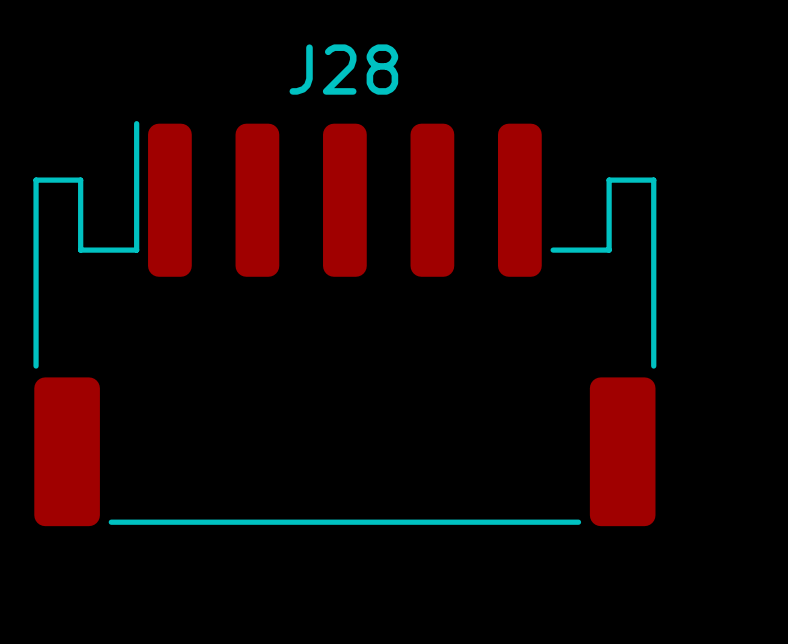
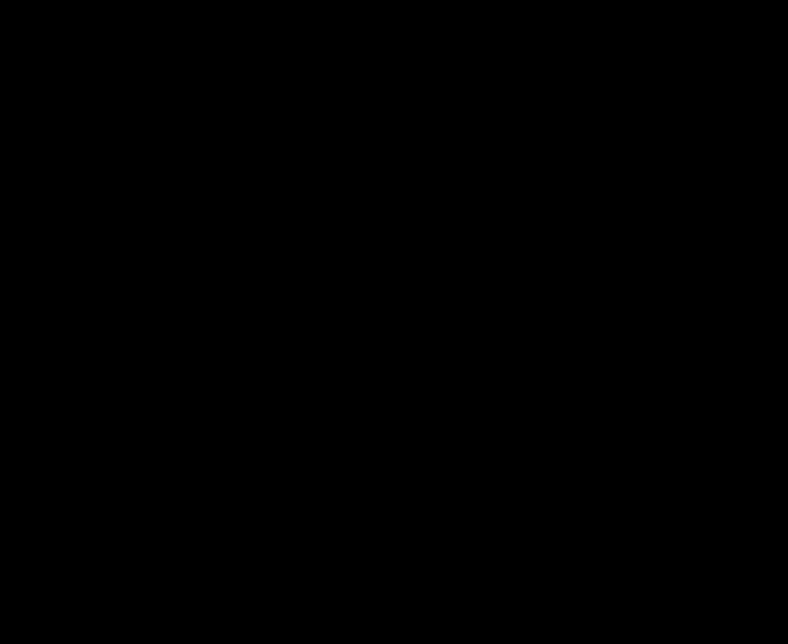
J28: (344, 323) -> none

